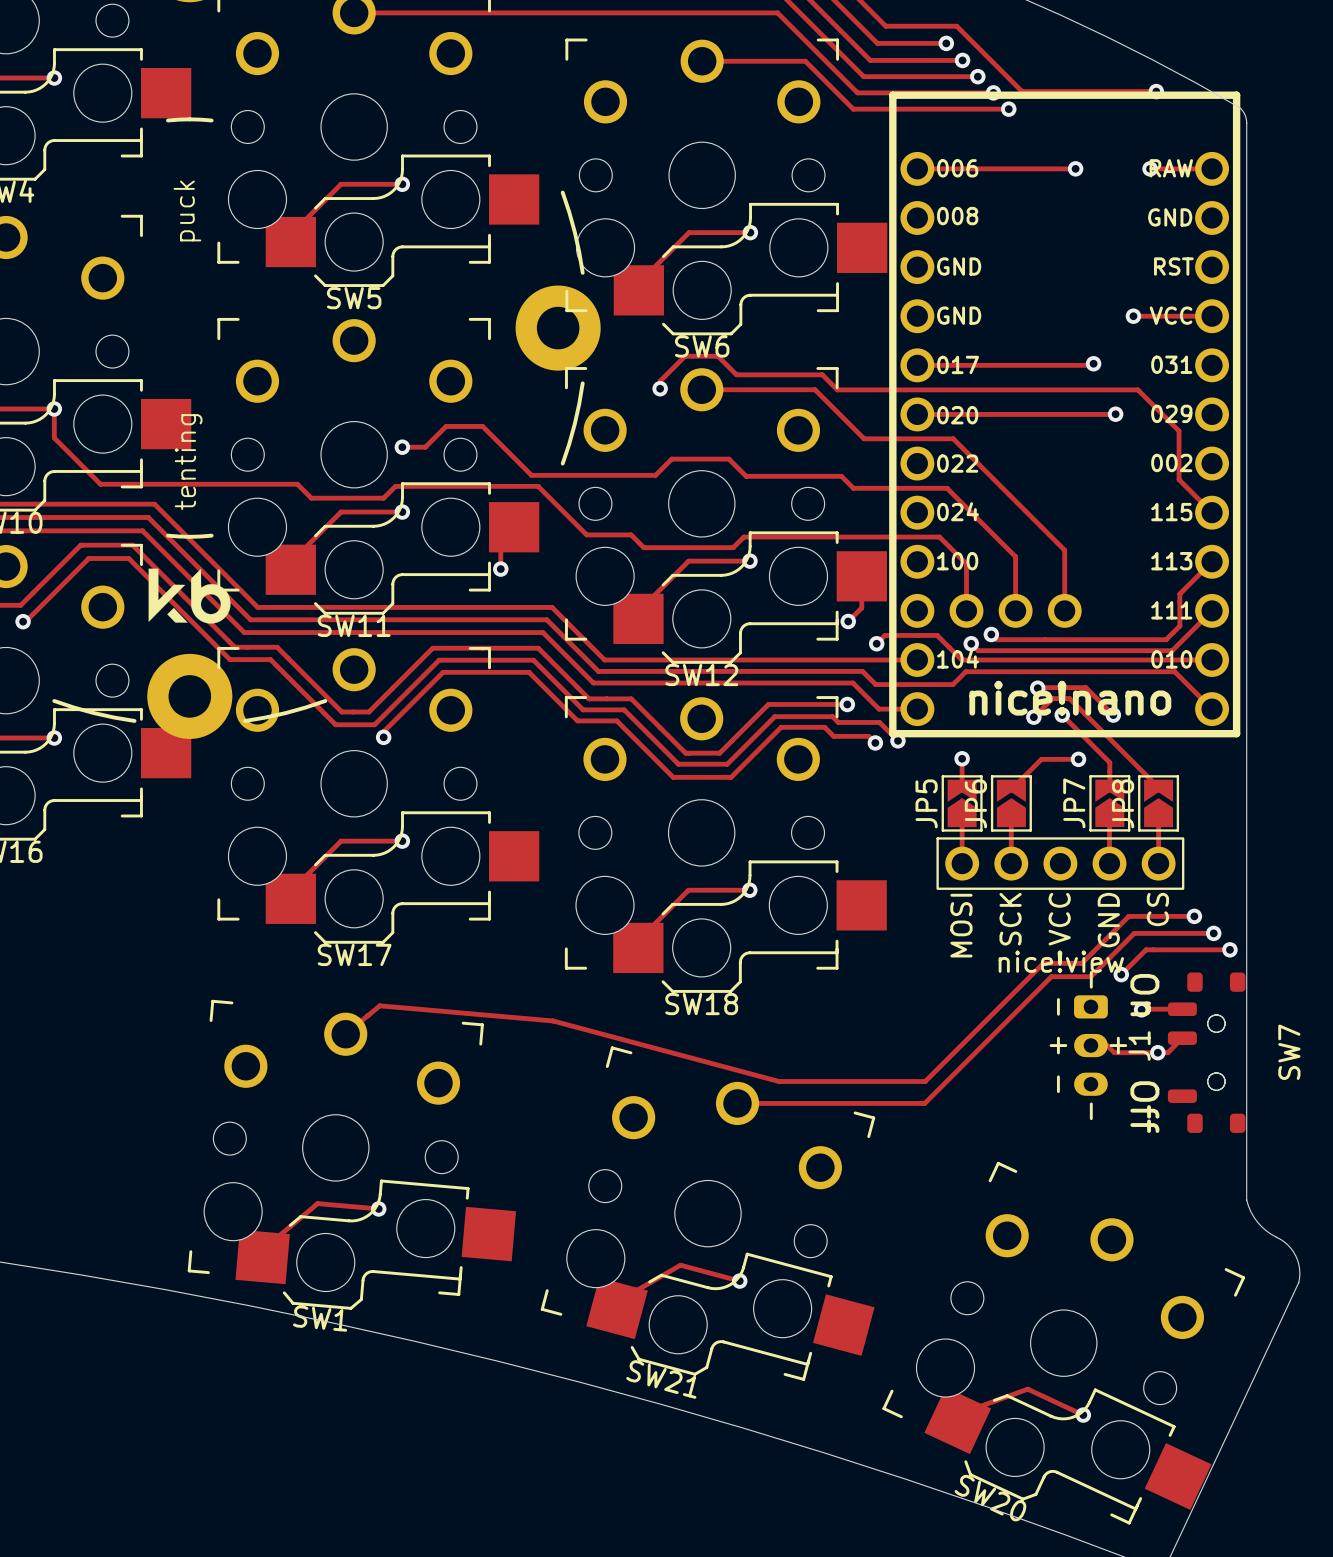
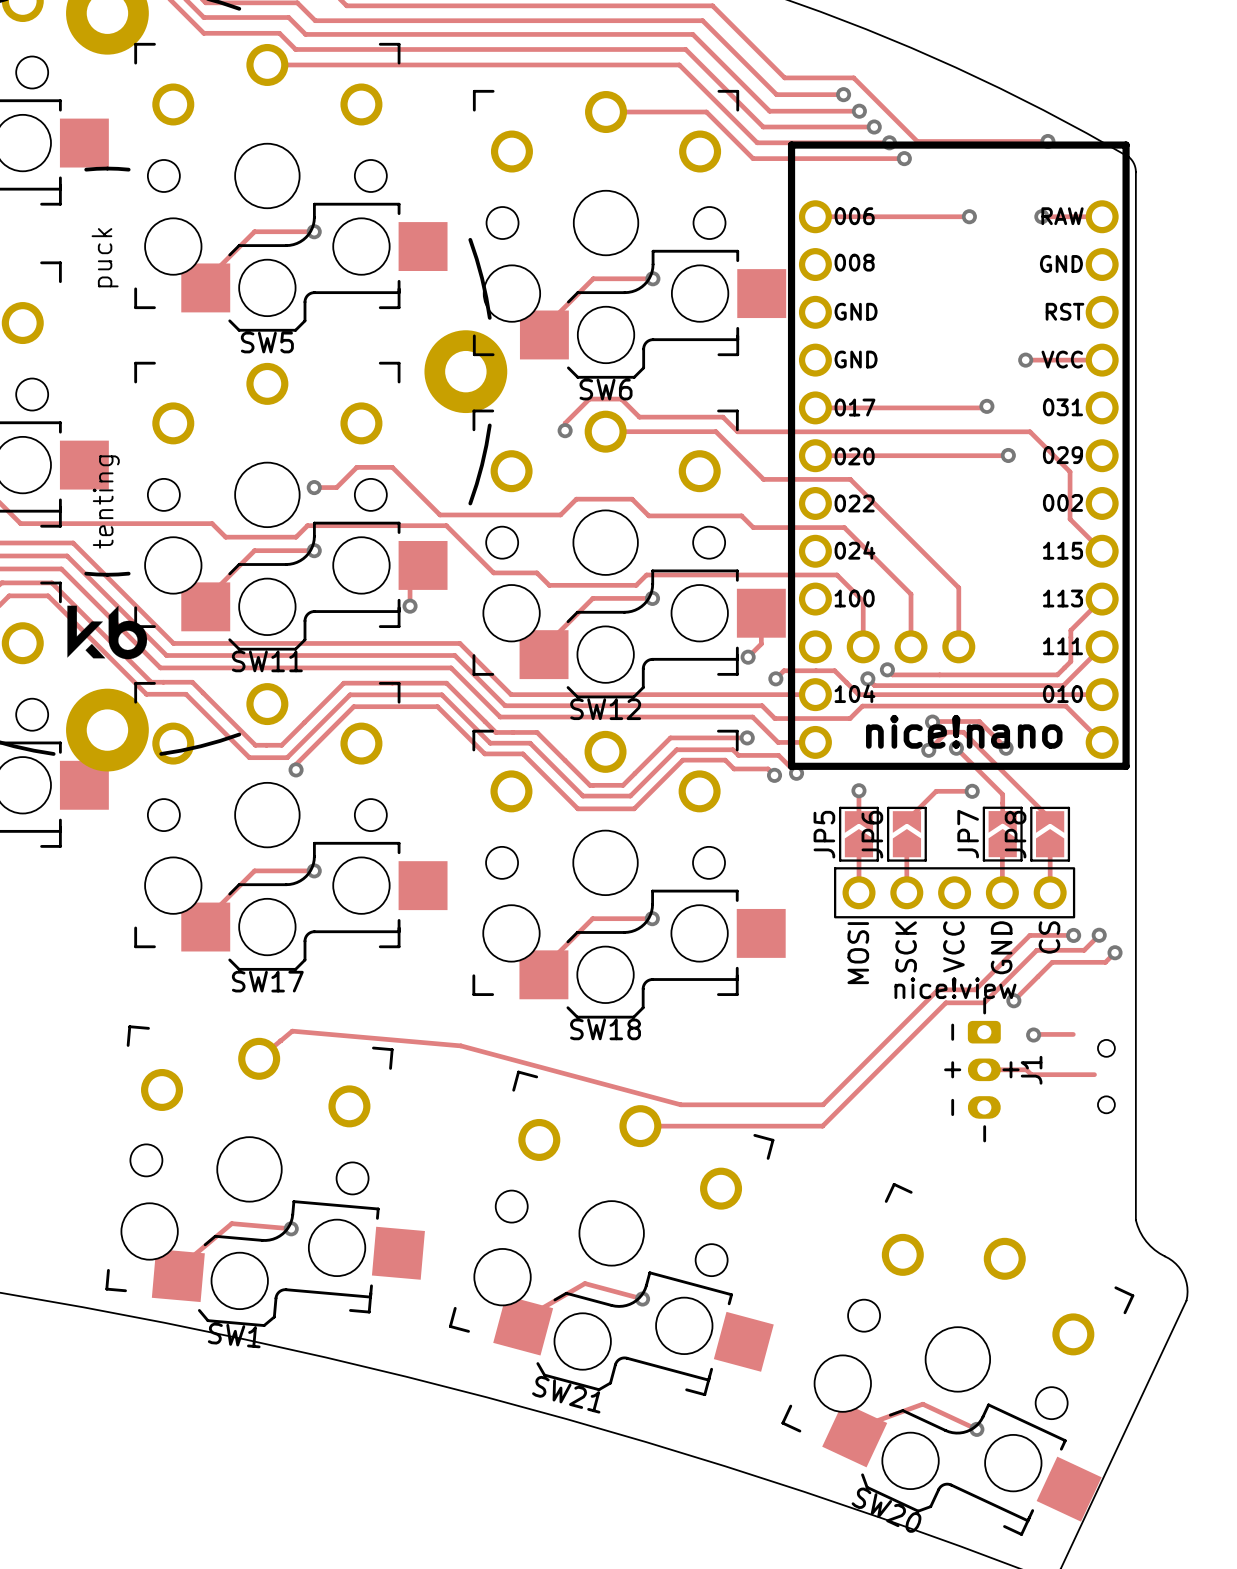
via: none -> (1073, 935)
via: none -> (1099, 935)
track: (1128, 916) (1194, 916) -> (1021, 944) (1029, 935) (1073, 935)
via: (1194, 916) -> none
track: (1134, 933) (1213, 933) -> (1026, 960) (1036, 950) (1084, 950) (1099, 935)
via position: (1213, 933) -> (1115, 952)
track: (1146, 949) (1229, 949) -> (1037, 976) (1052, 962) (1105, 962) (1115, 952)
via: (1229, 949) -> none
track: (1182, 1038) (1167, 1052) (1114, 1052) (1107, 1045) -> (1094, 1074) (1031, 1074) (1026, 1069) (1000, 1069)
via: (1157, 1052) -> none
SW7: (1206, 1052) -> none

